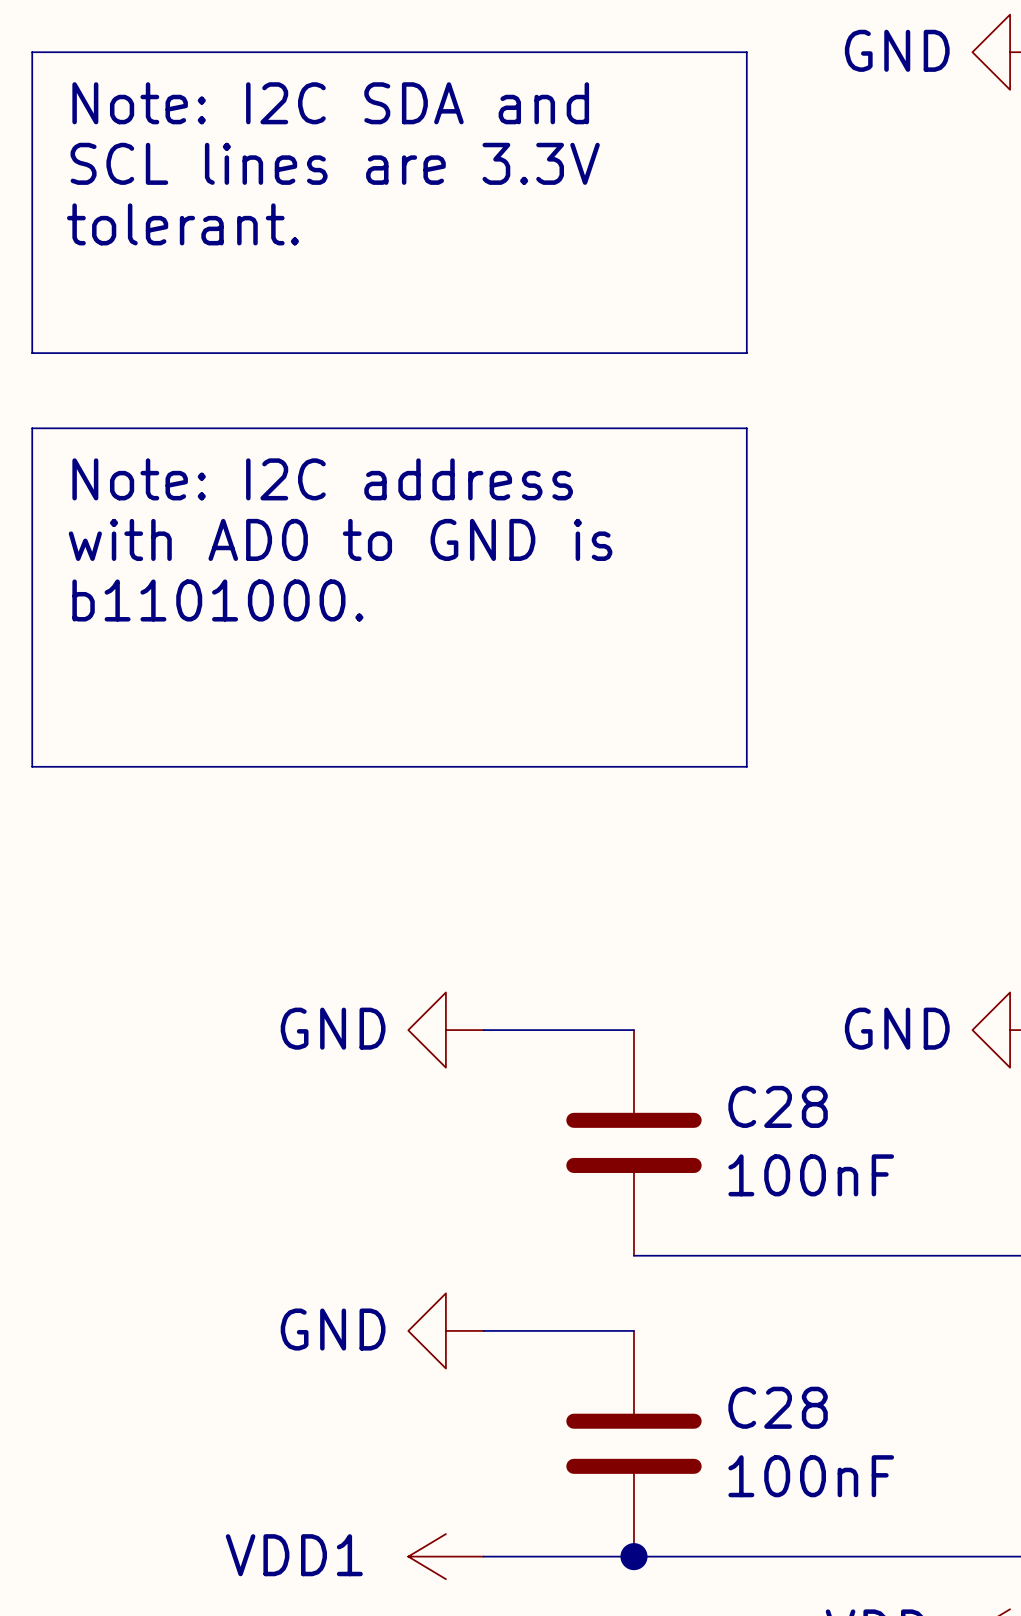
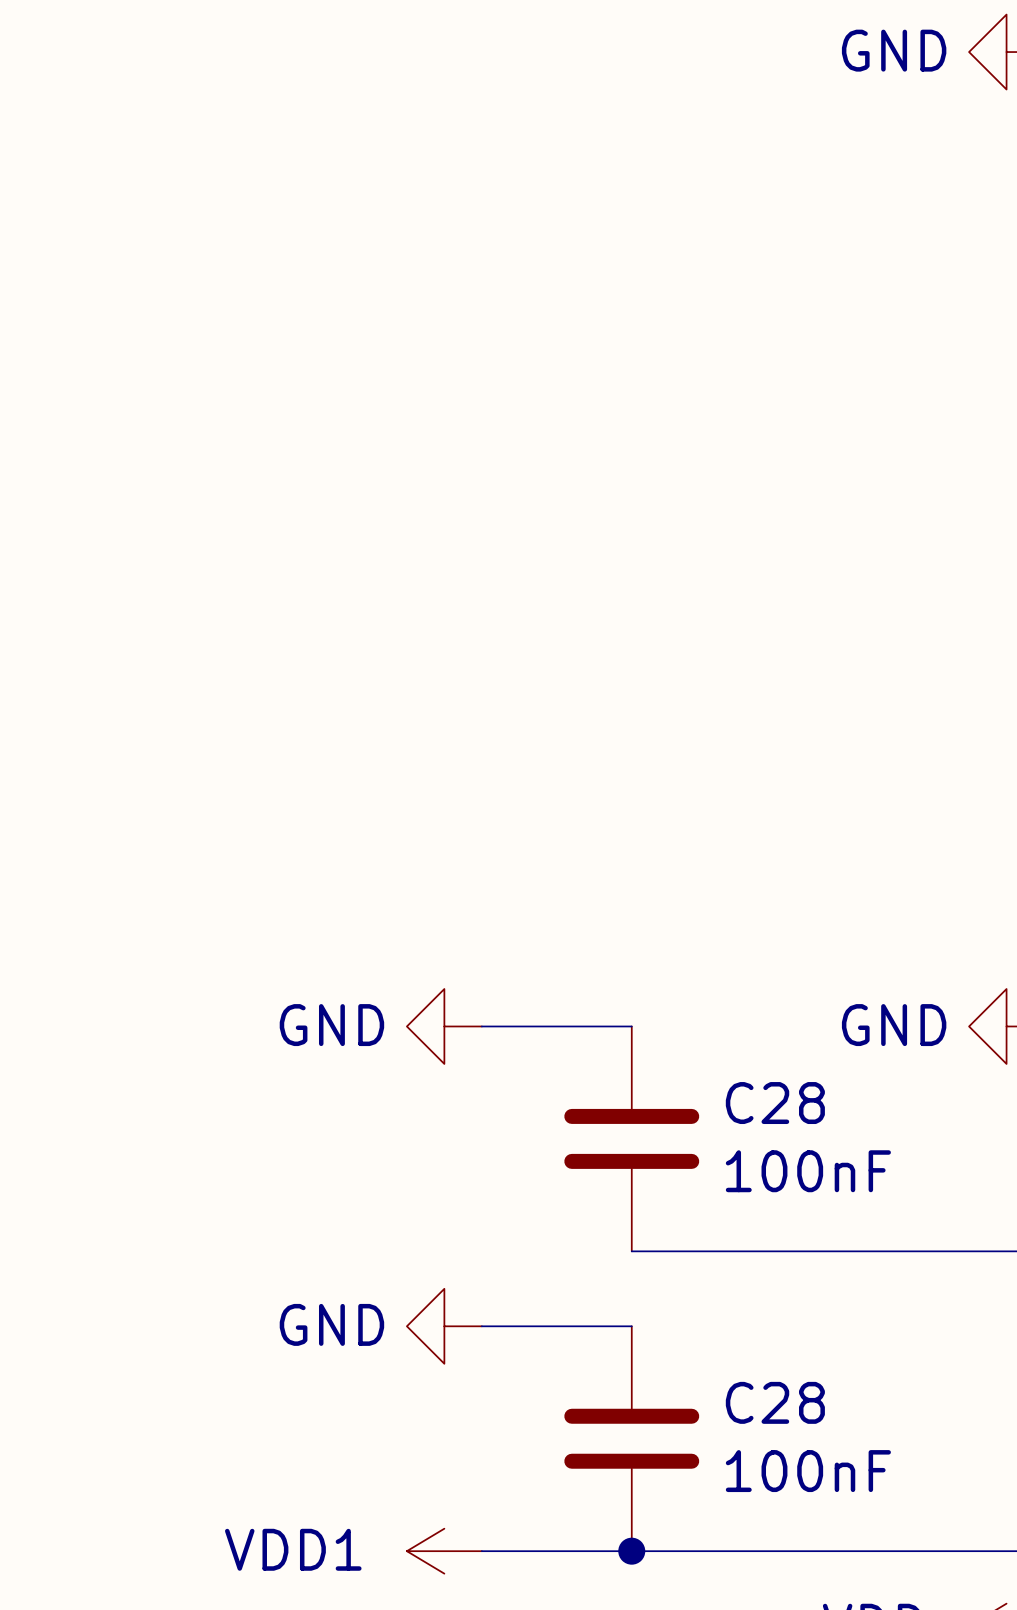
line: (32, 52) (746, 52) (746, 353) (32, 353) (32, 52) -> none
text: Note: I2C SDA and (330, 103) -> none
text: SCL lines are 3.3V (335, 163) -> none
text: tolerant. (182, 224) -> none
line: (32, 428) (32, 766) (746, 766) (746, 428) (32, 428) -> none
text: Note: I2C address (322, 479) -> none
text: with AD0 to GND is (340, 539) -> none
text: b1101000. (217, 600) -> none

